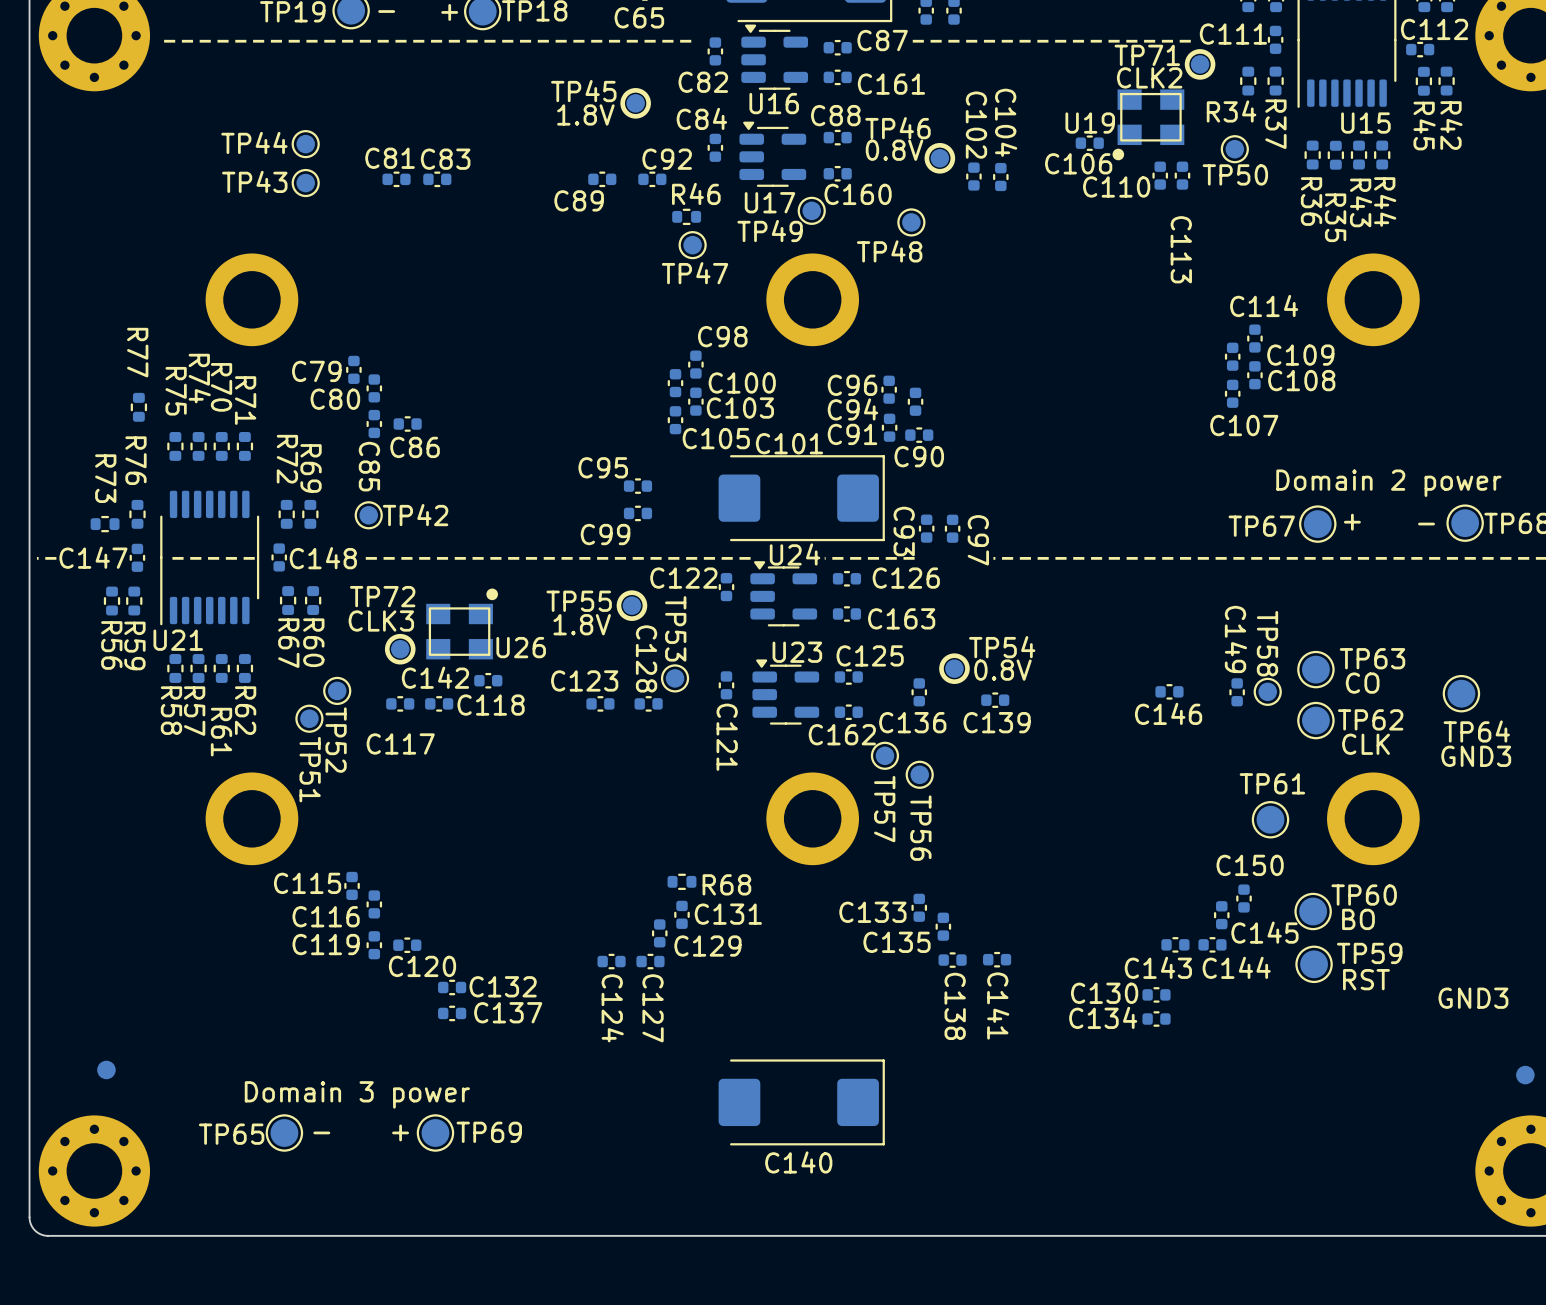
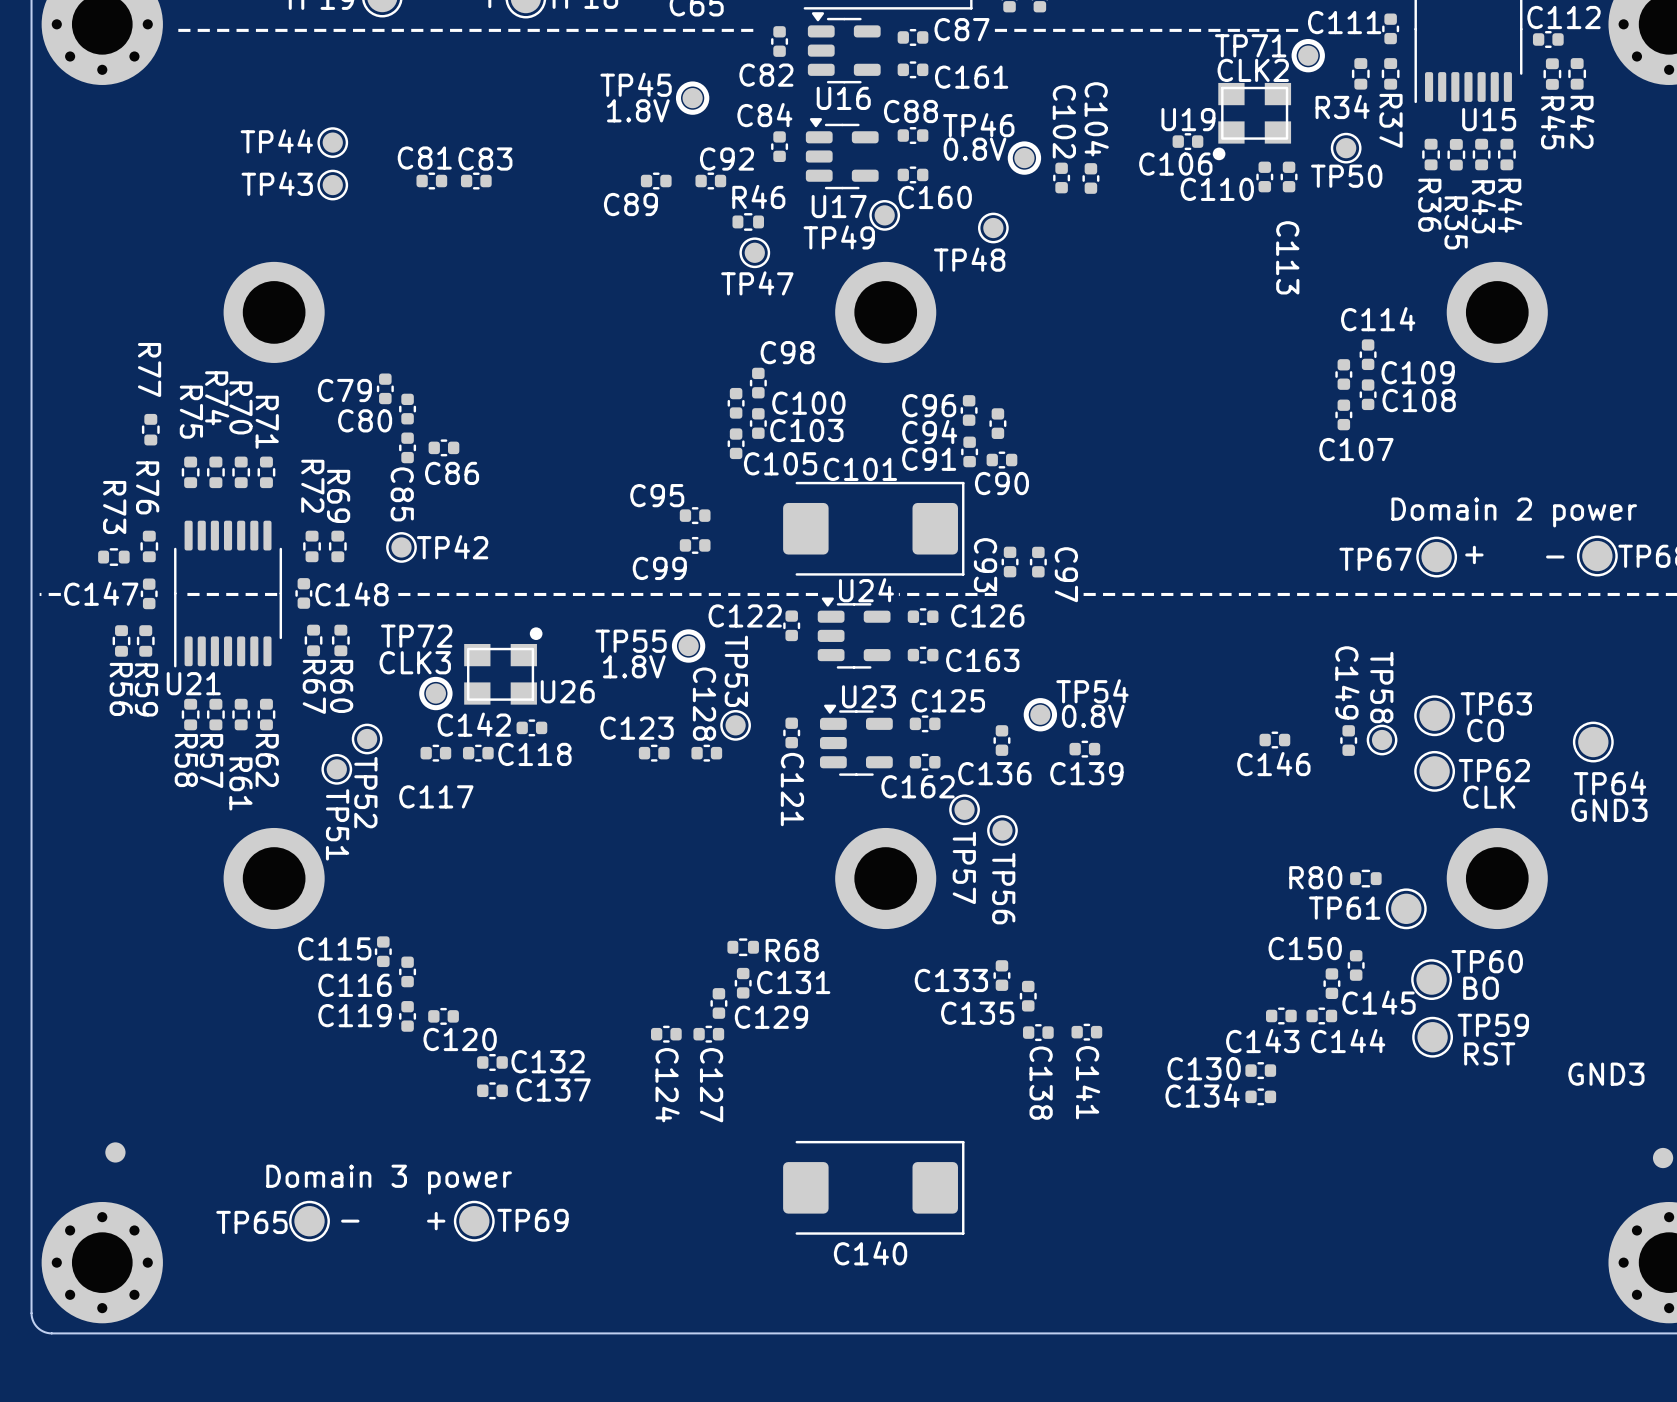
TP61 name position: TP61 (1272, 783) -> TP61 (1344, 908)
R80: none -> (1365, 878)
TP61 position: (1270, 819) -> (1406, 908)
C150 name position: C150 (1250, 865) -> C150 (1305, 948)

